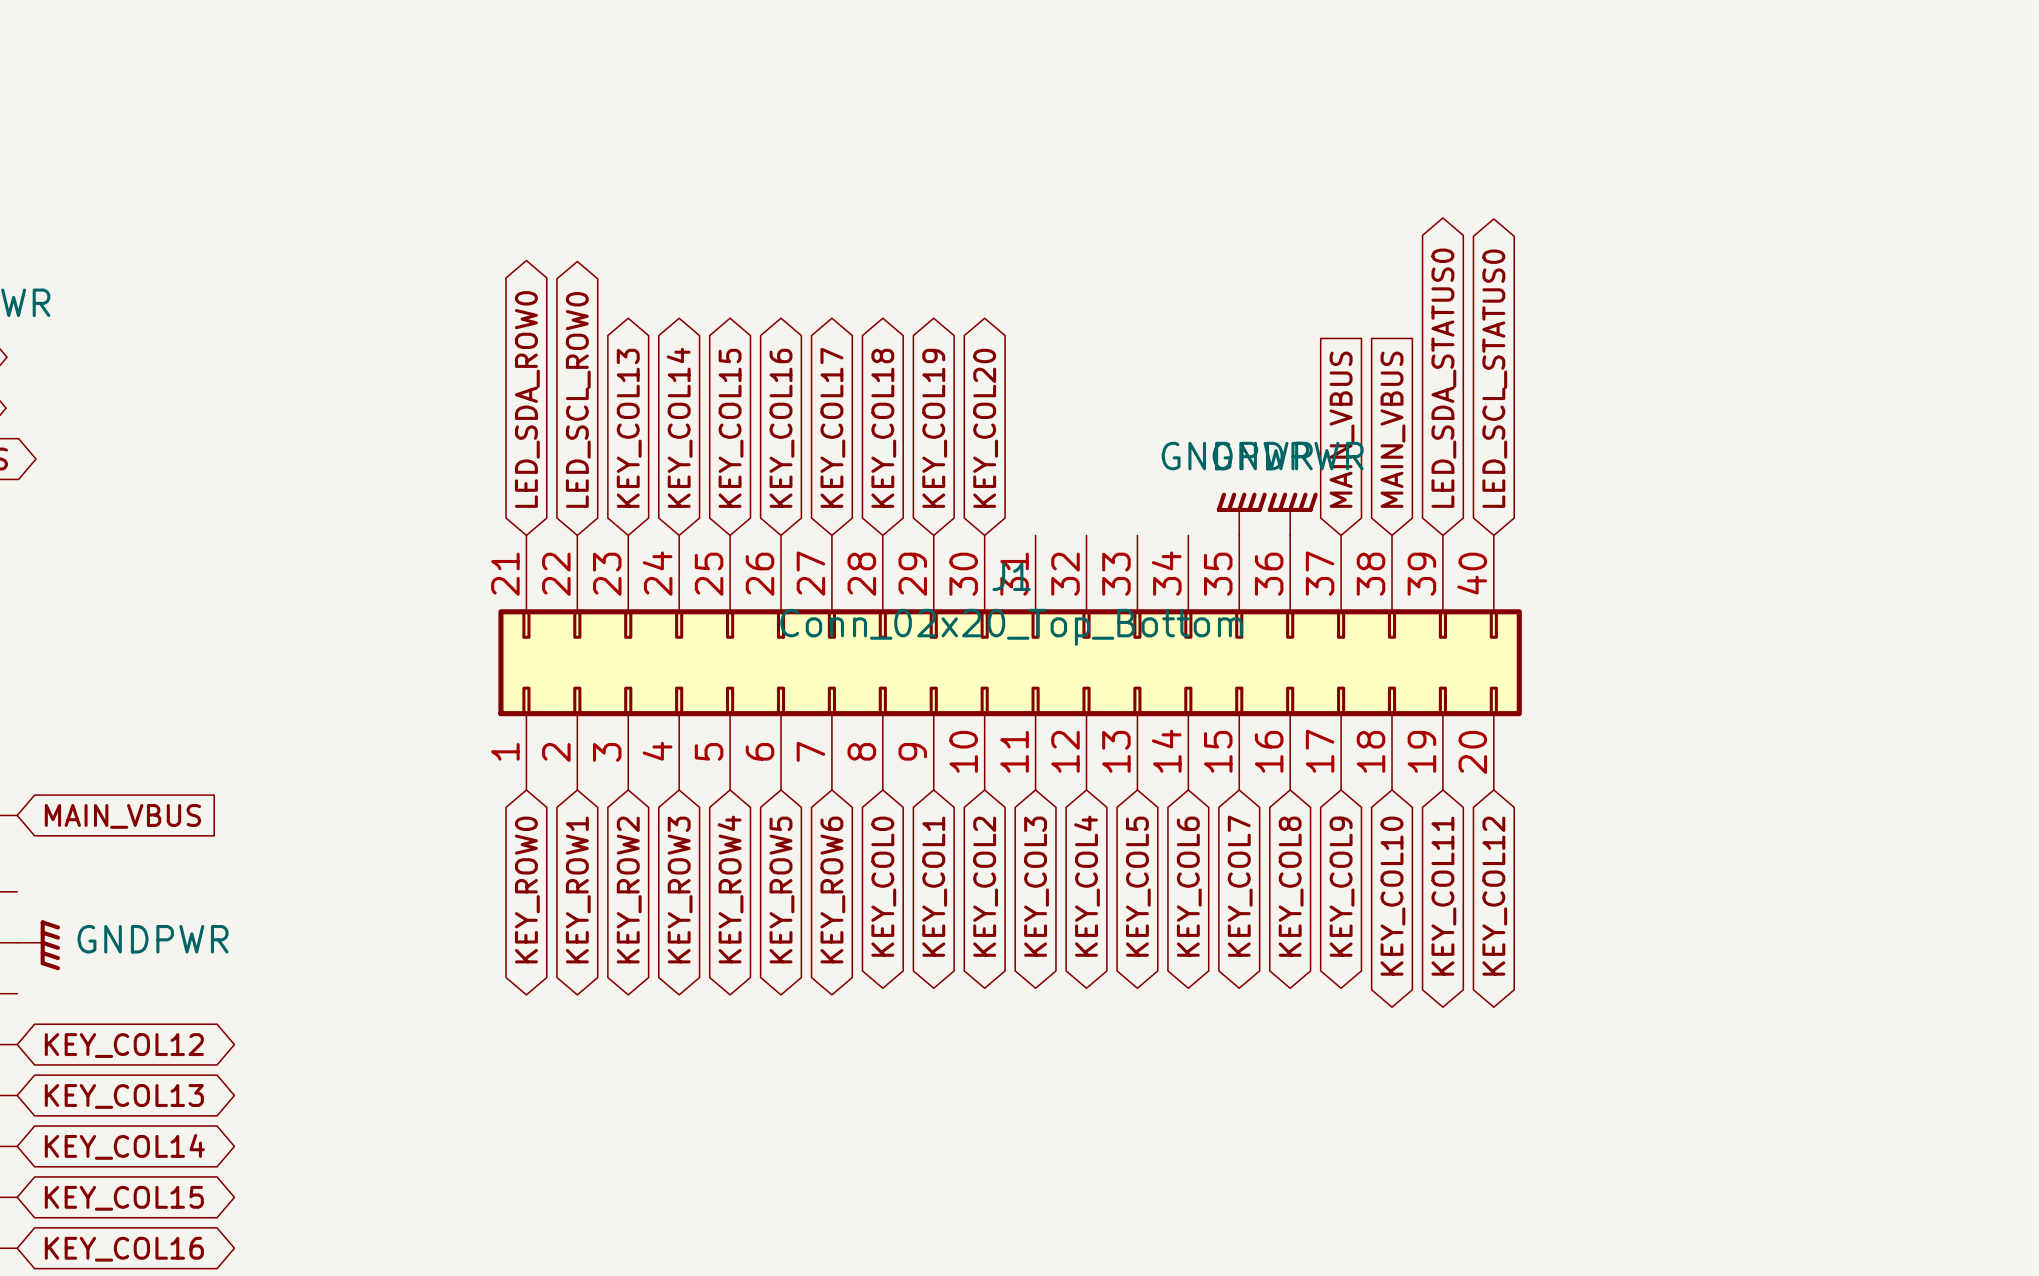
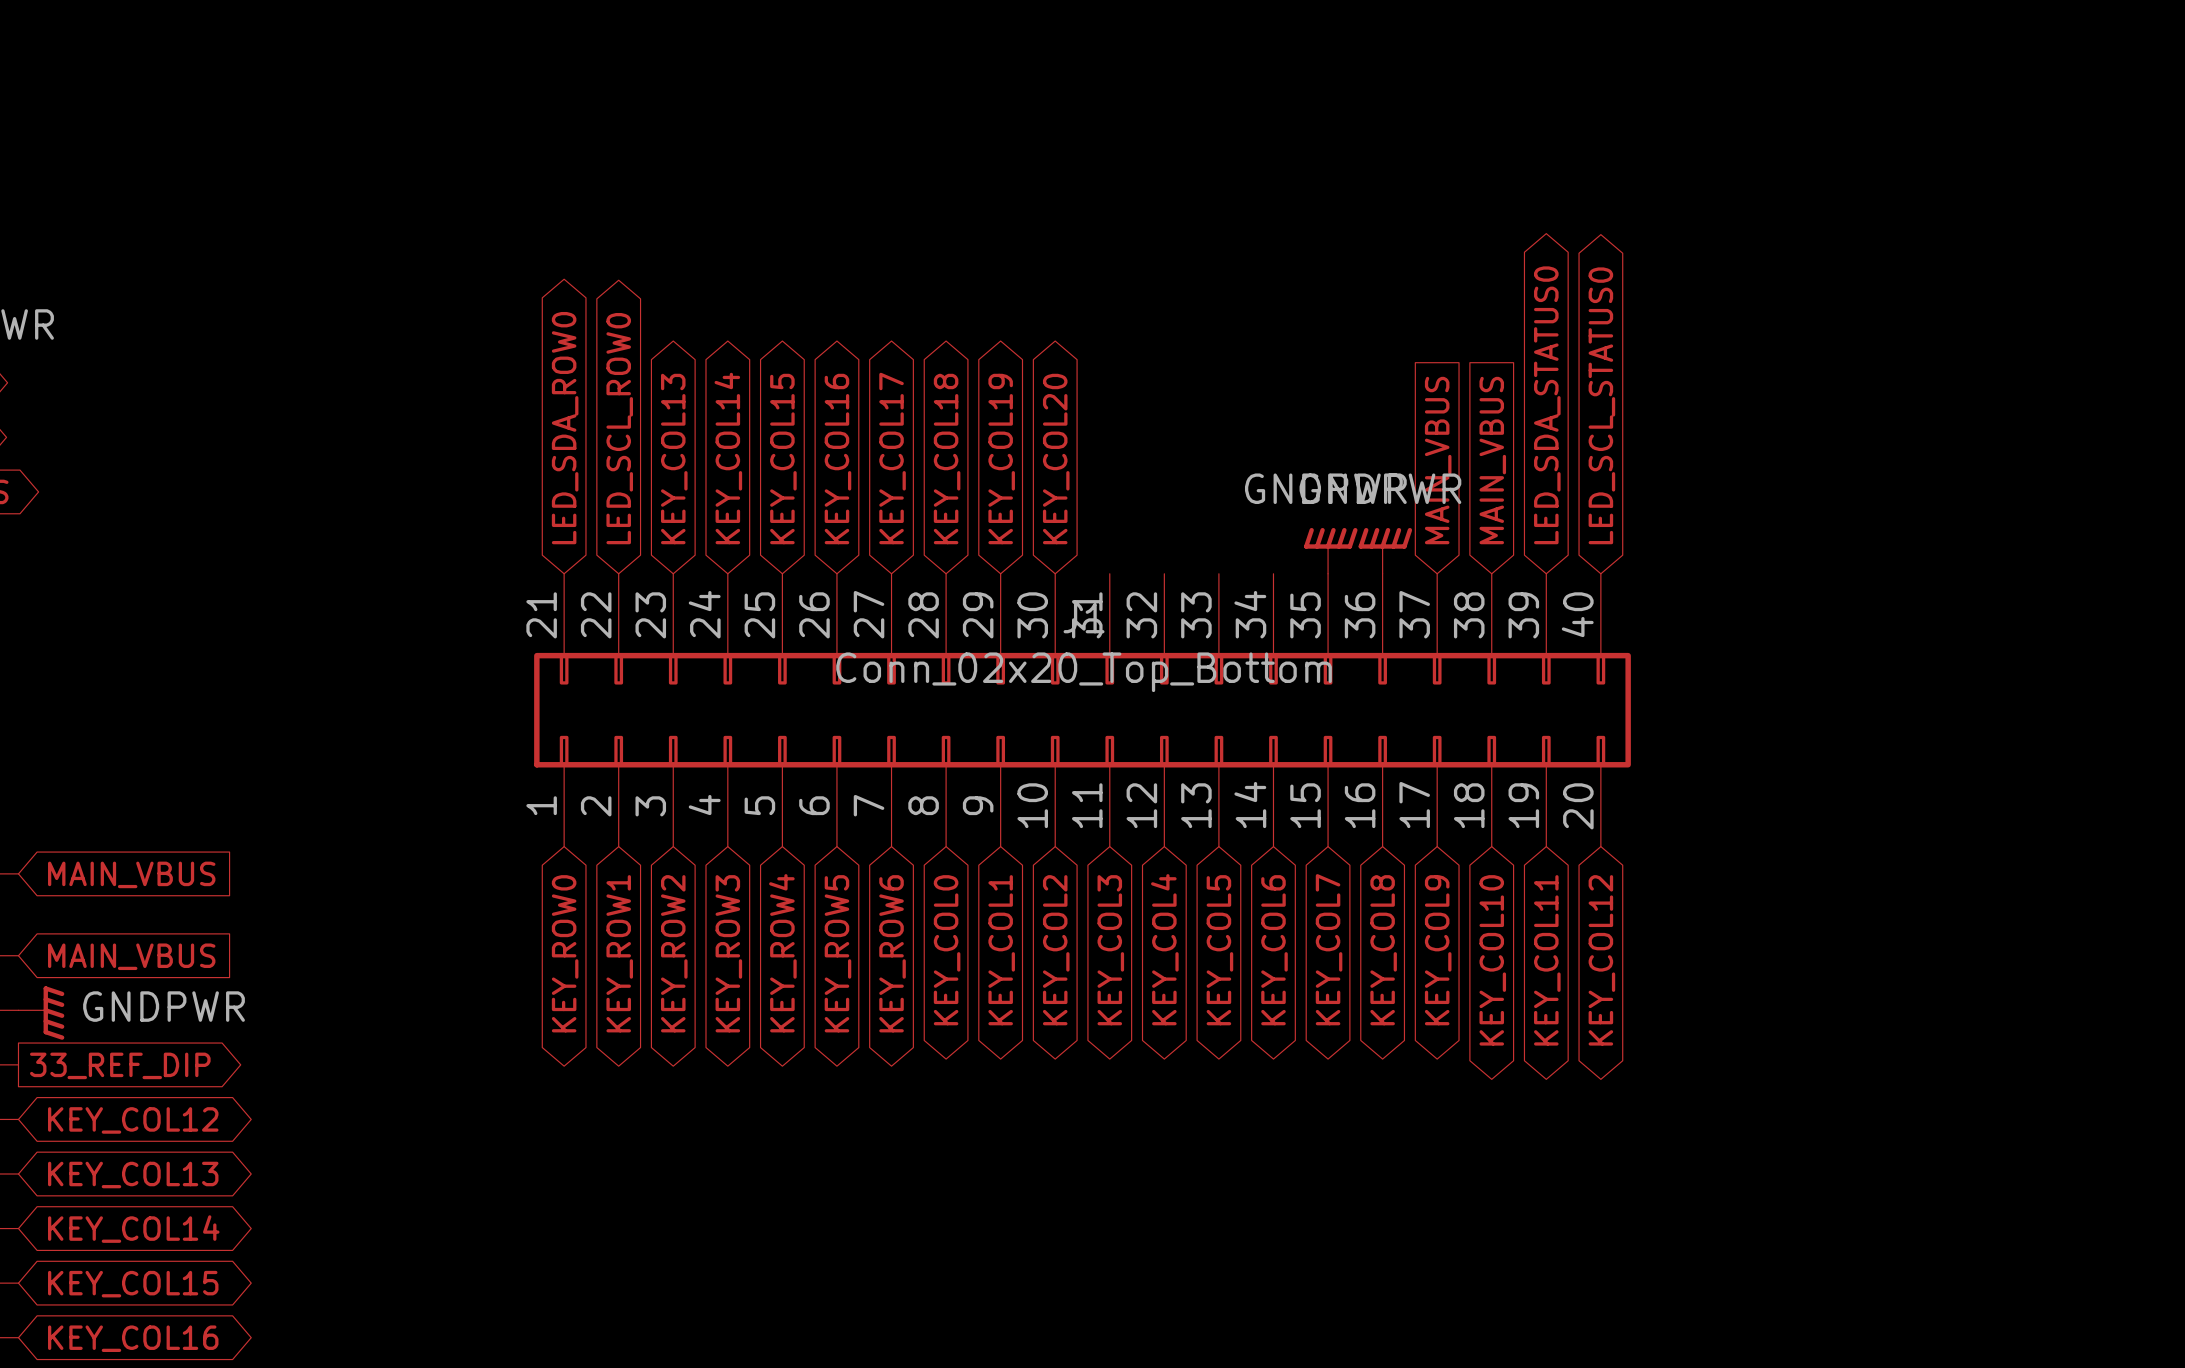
global label: none -> MAIN_VBUS (131, 956)
global label: none -> 33_REF_DIP (120, 1065)

